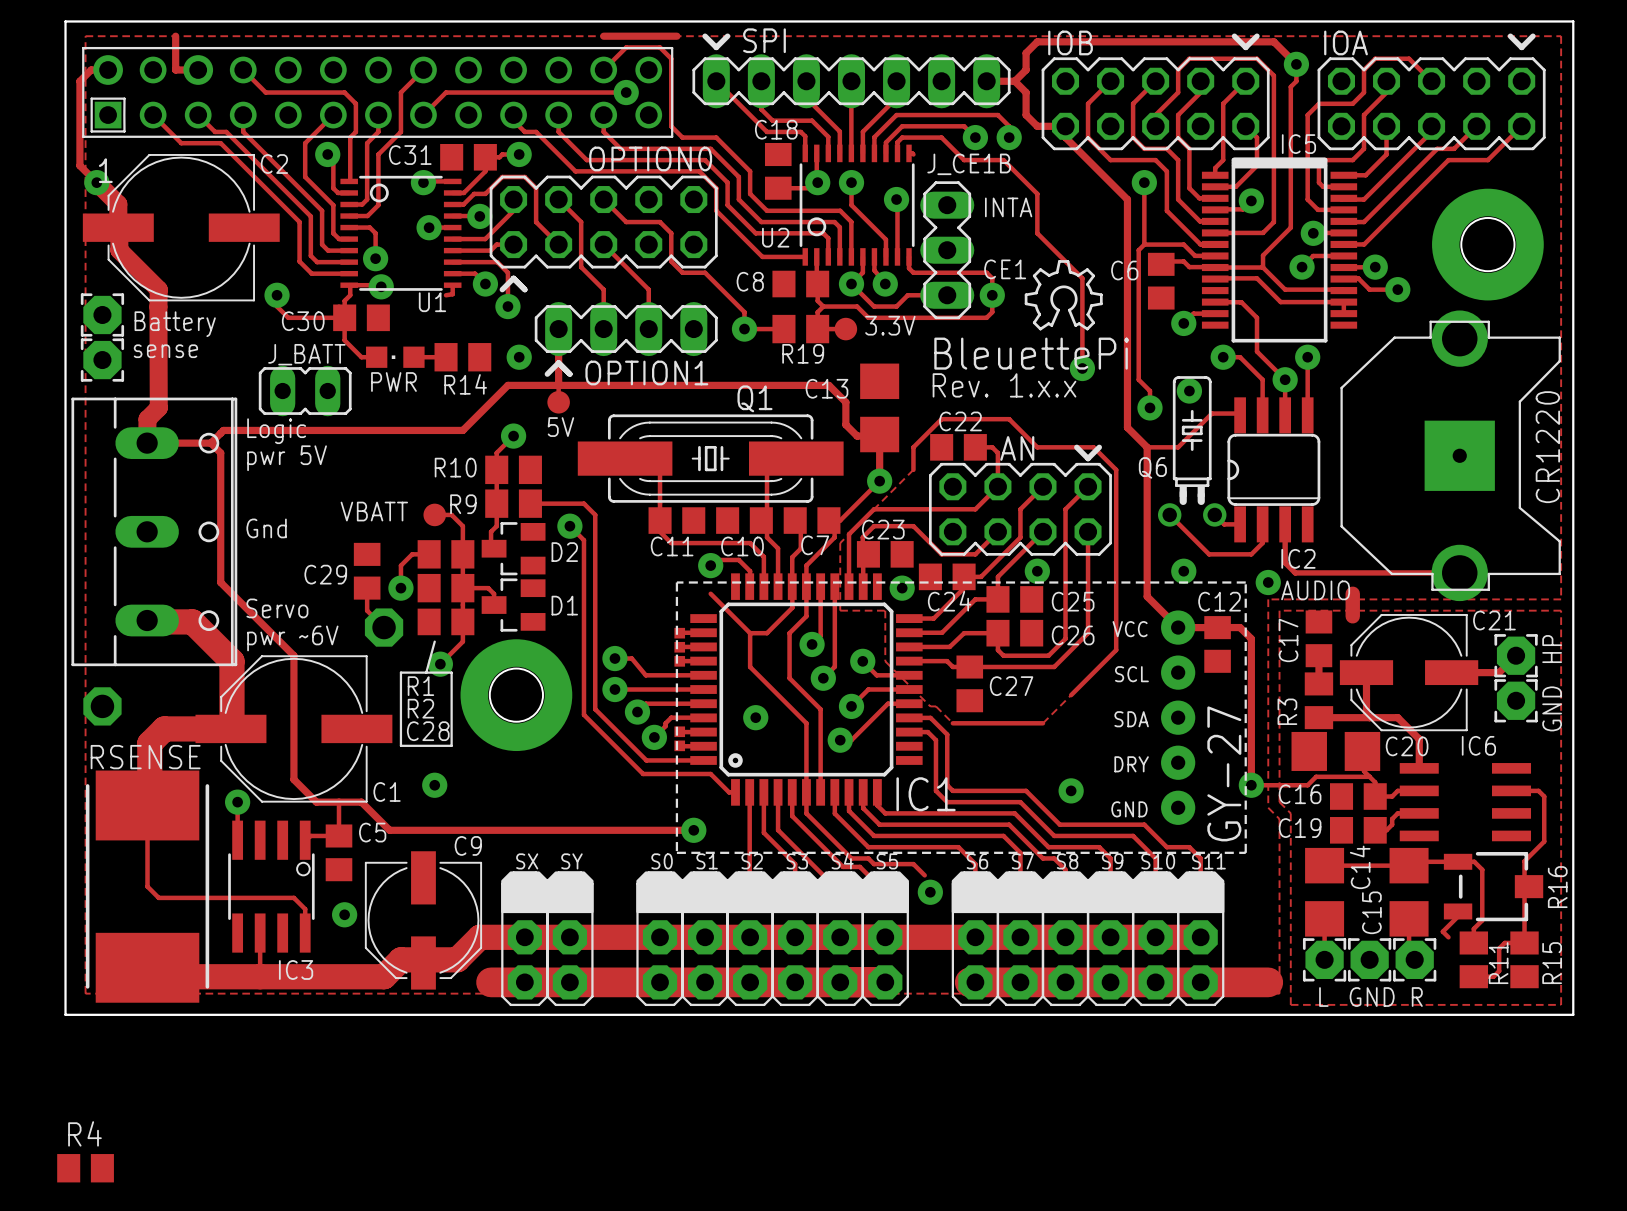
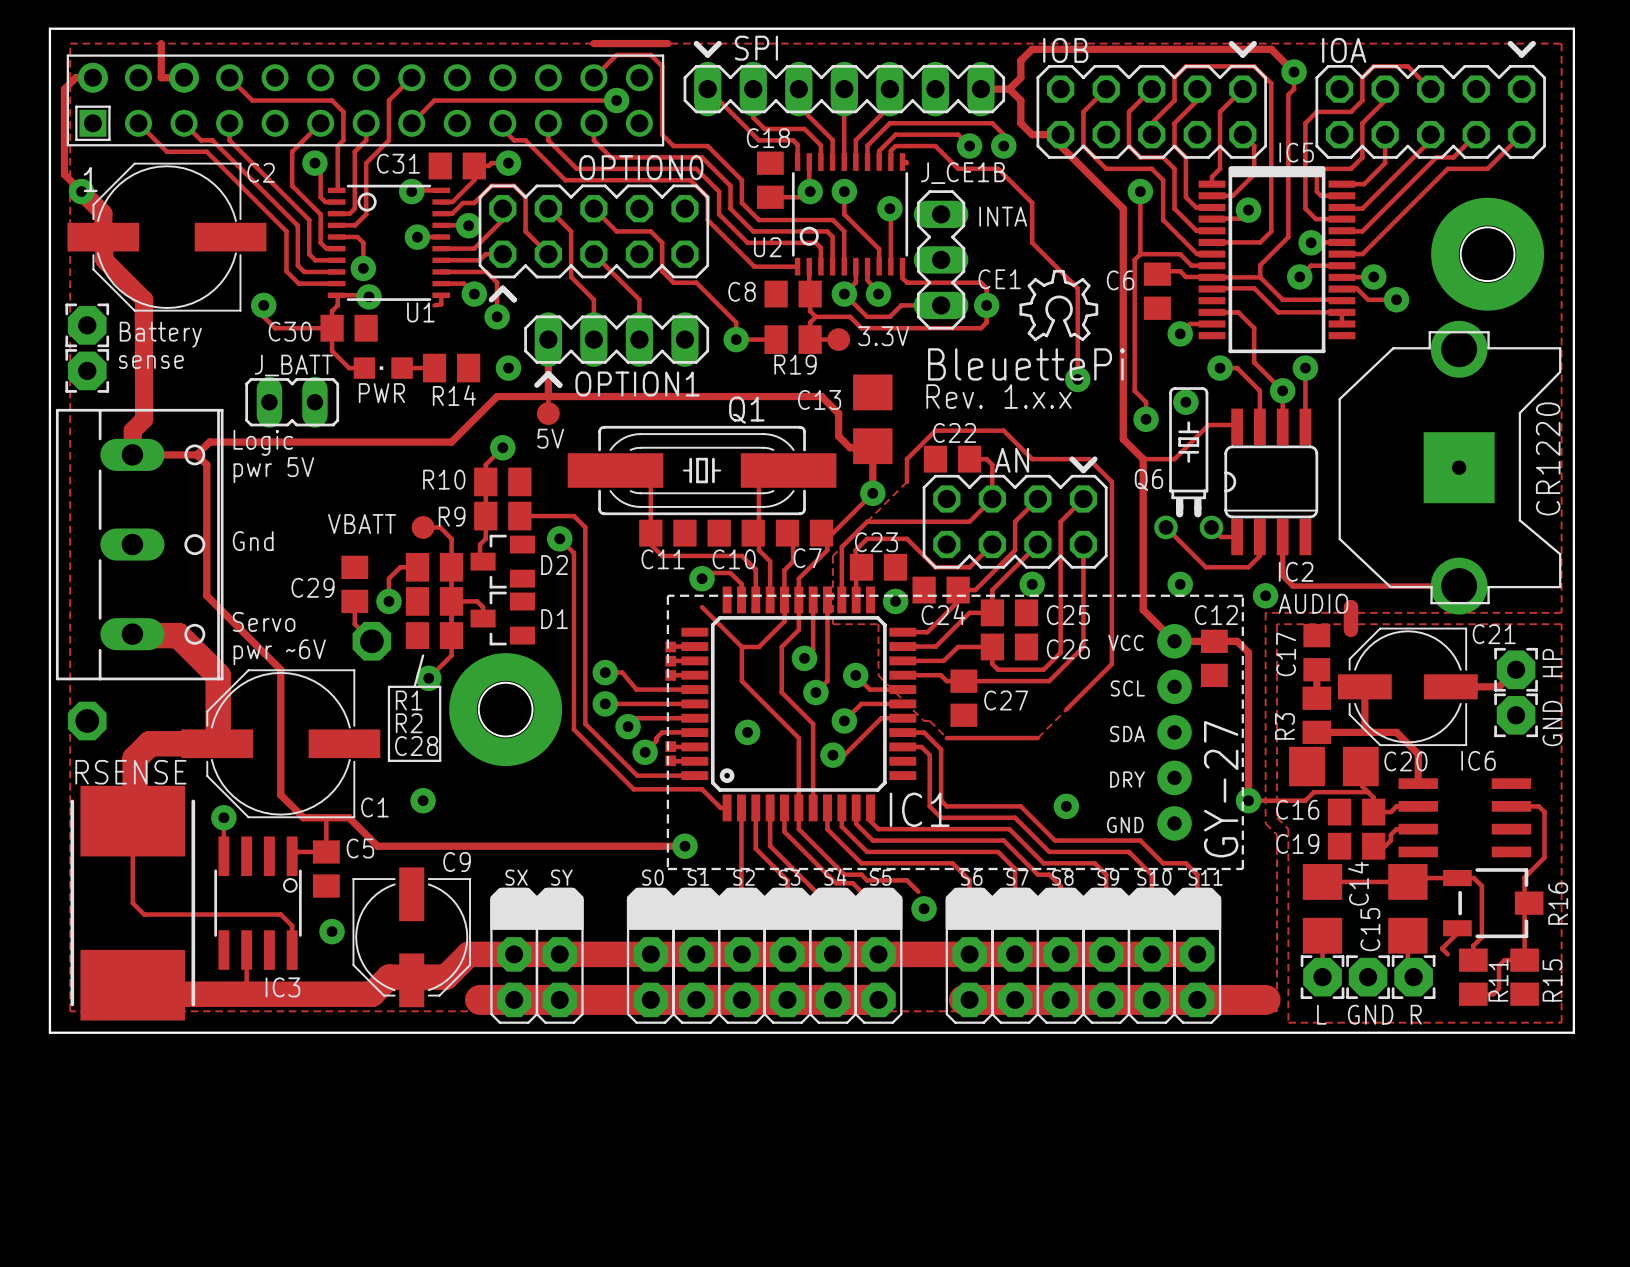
R4: (85, 1168) -> none

